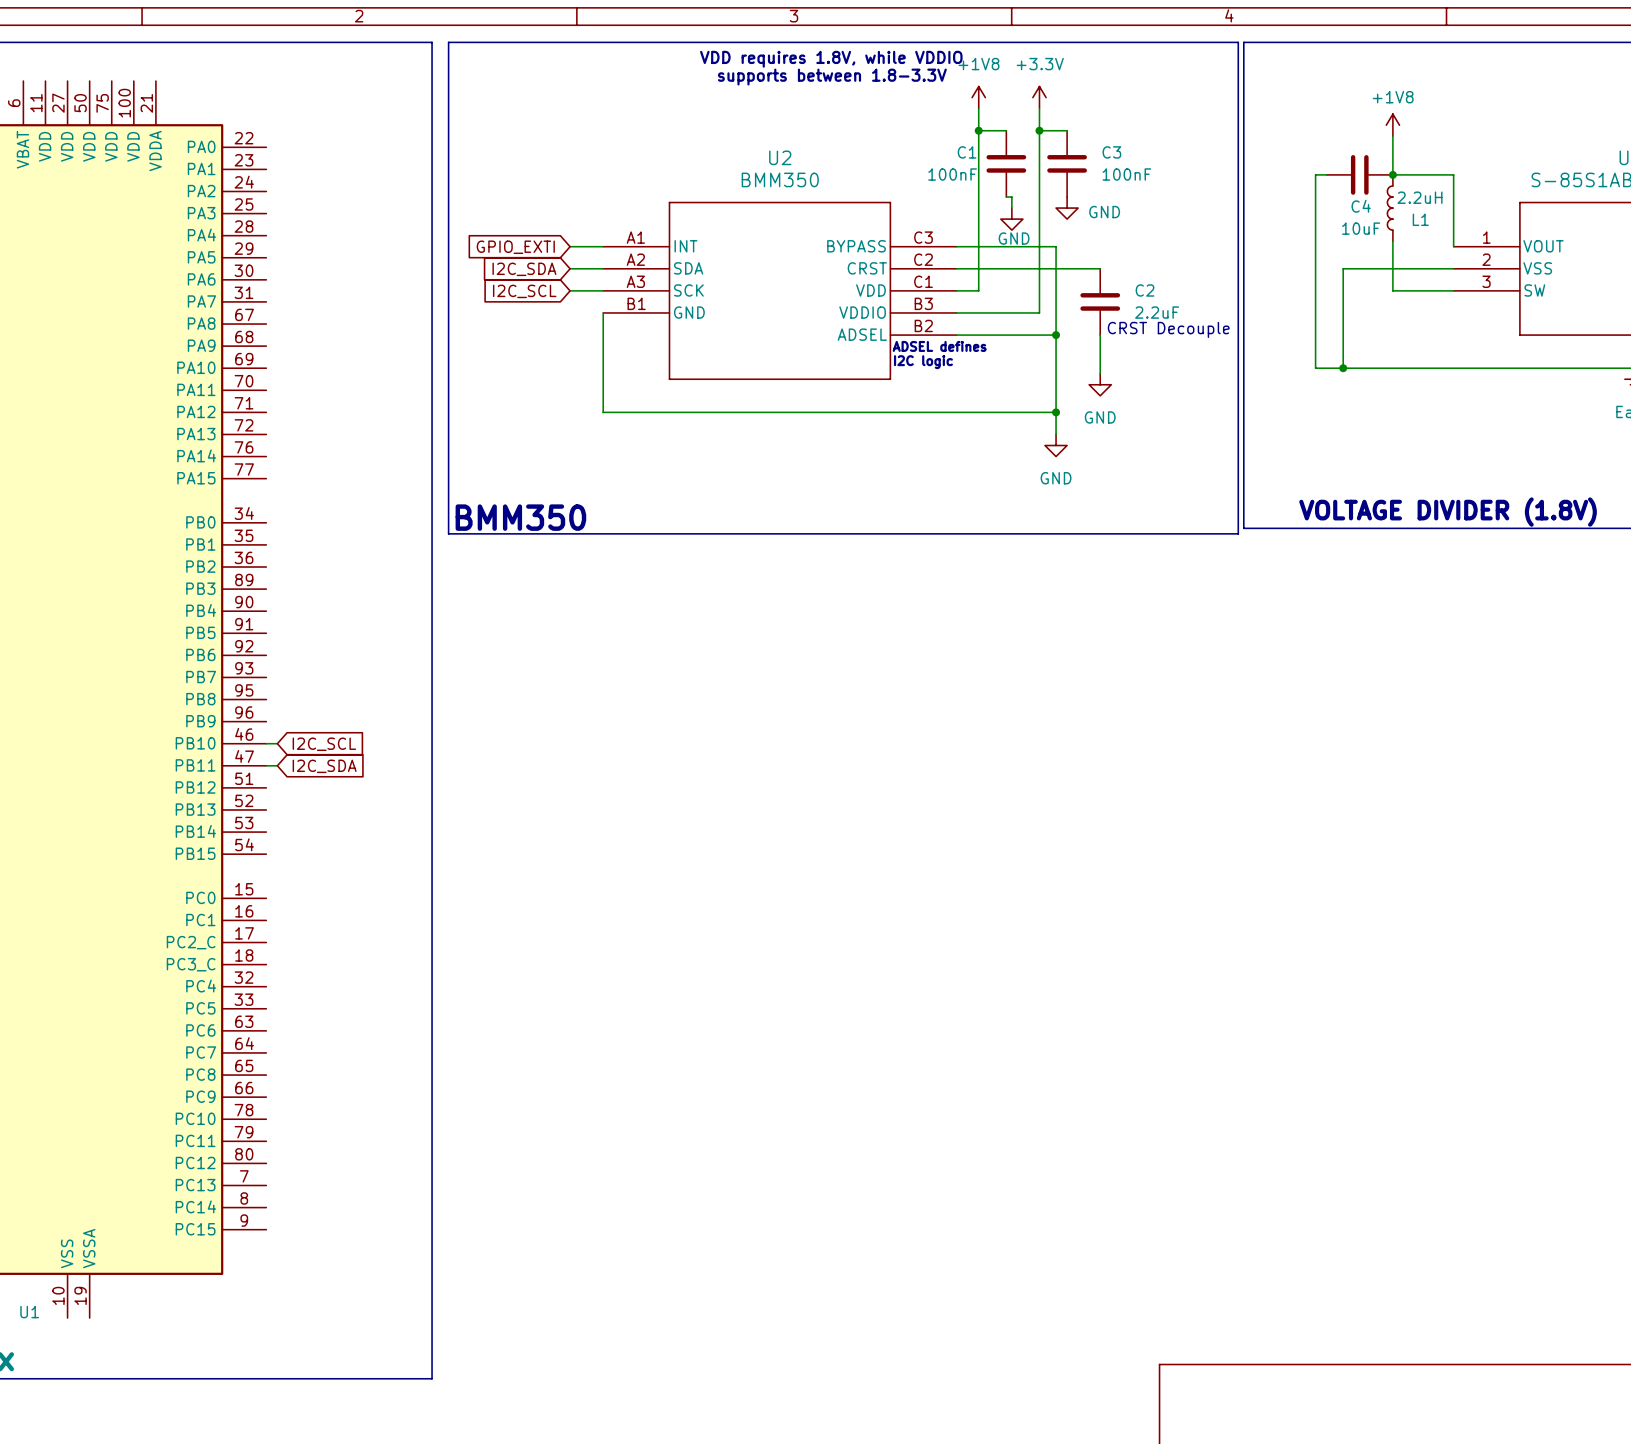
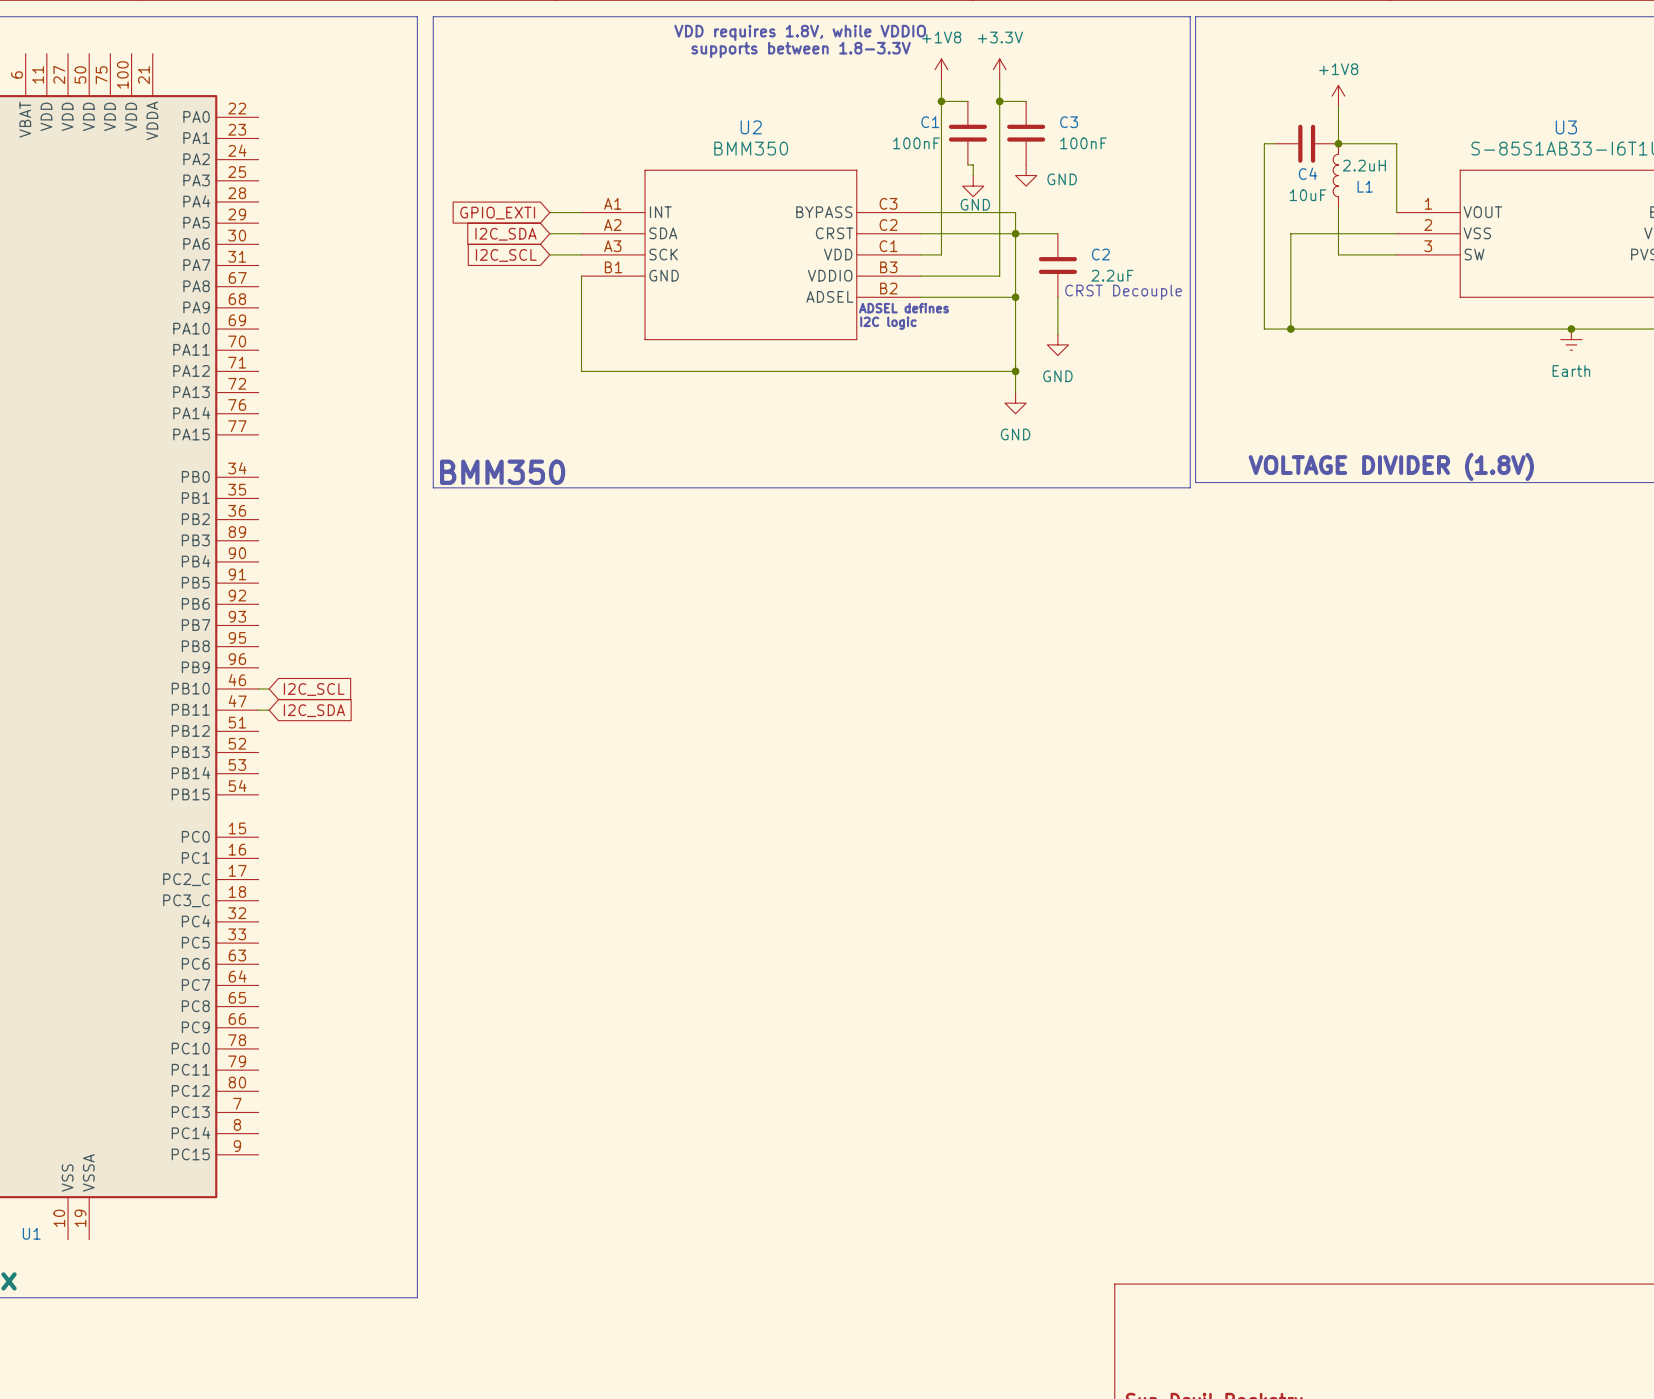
junction: none -> (1015, 233)

